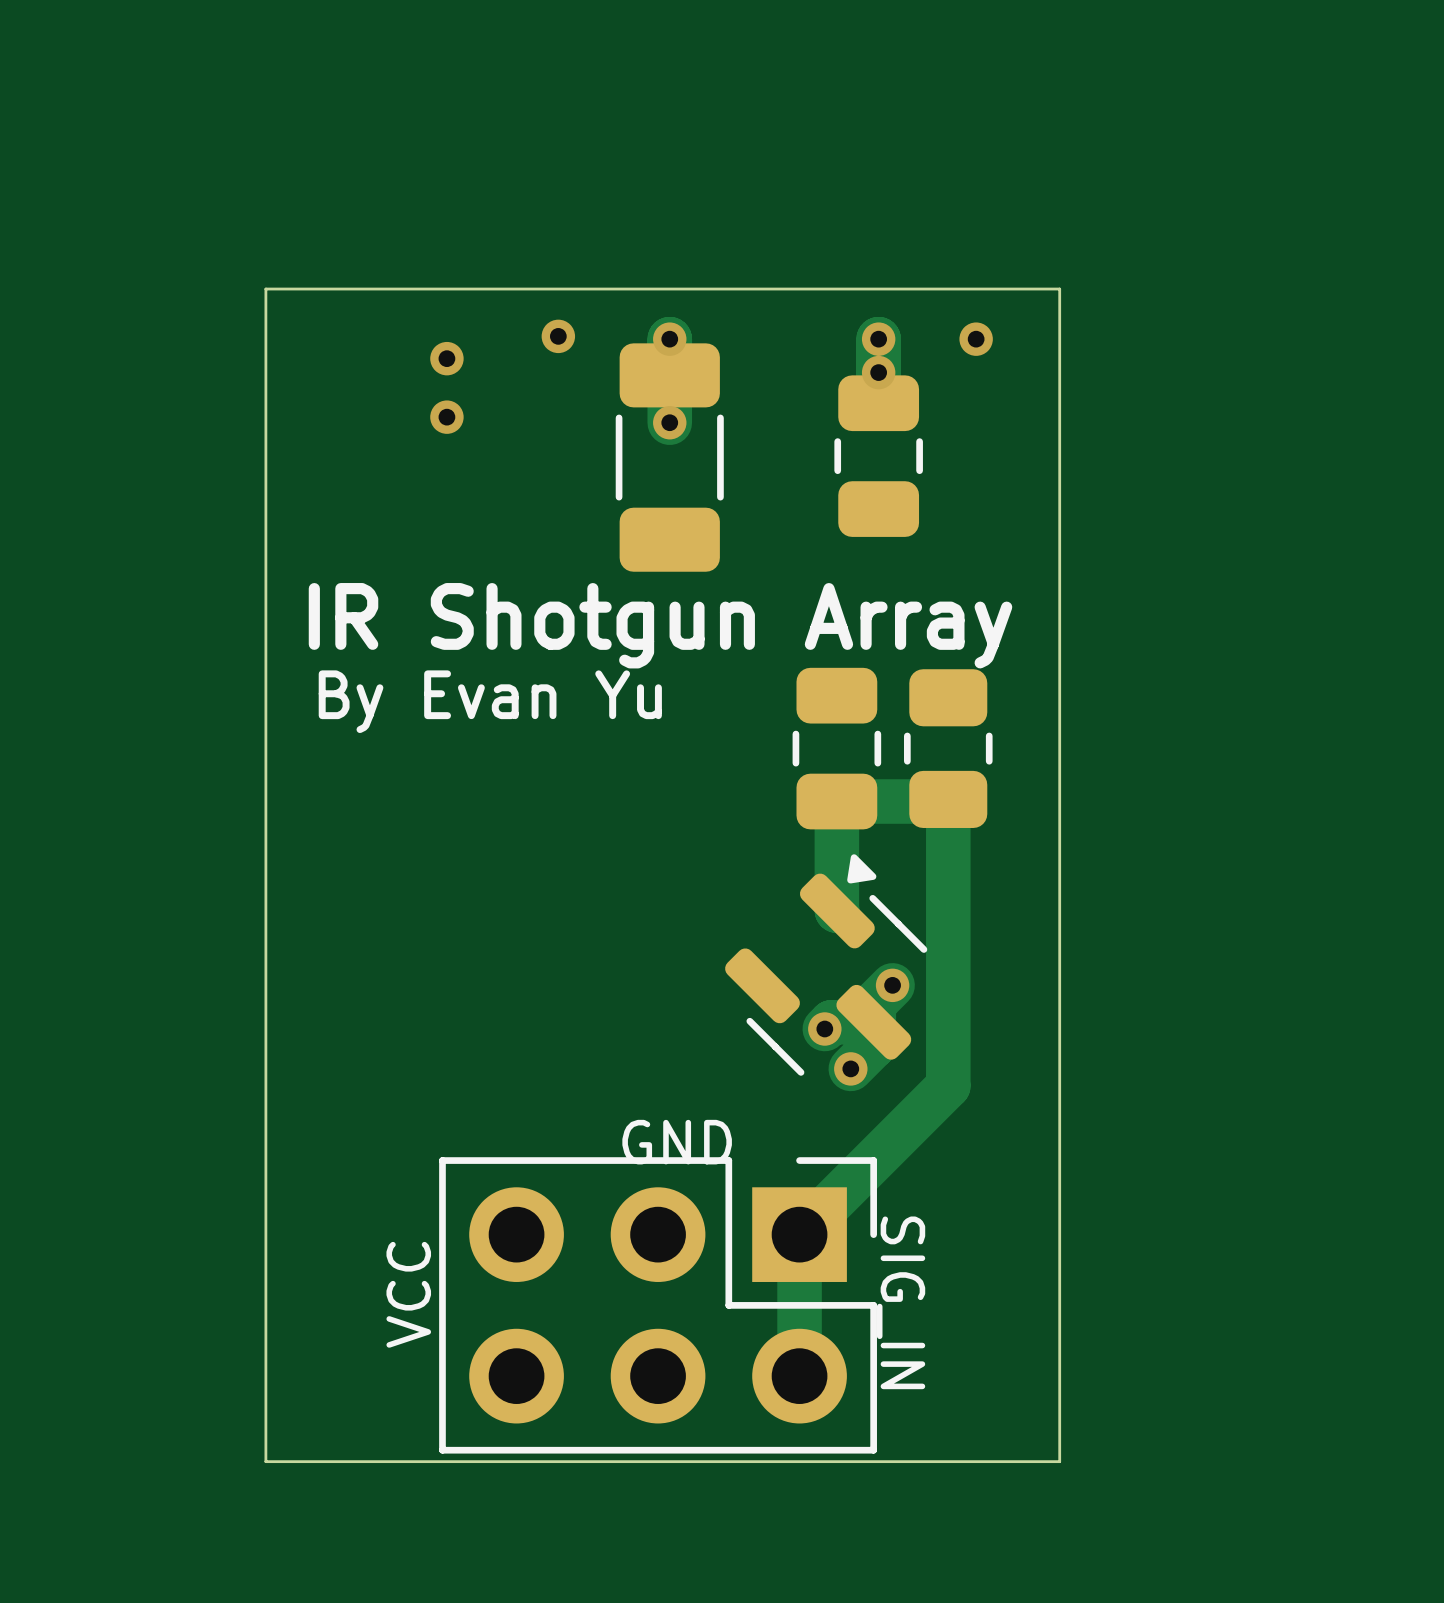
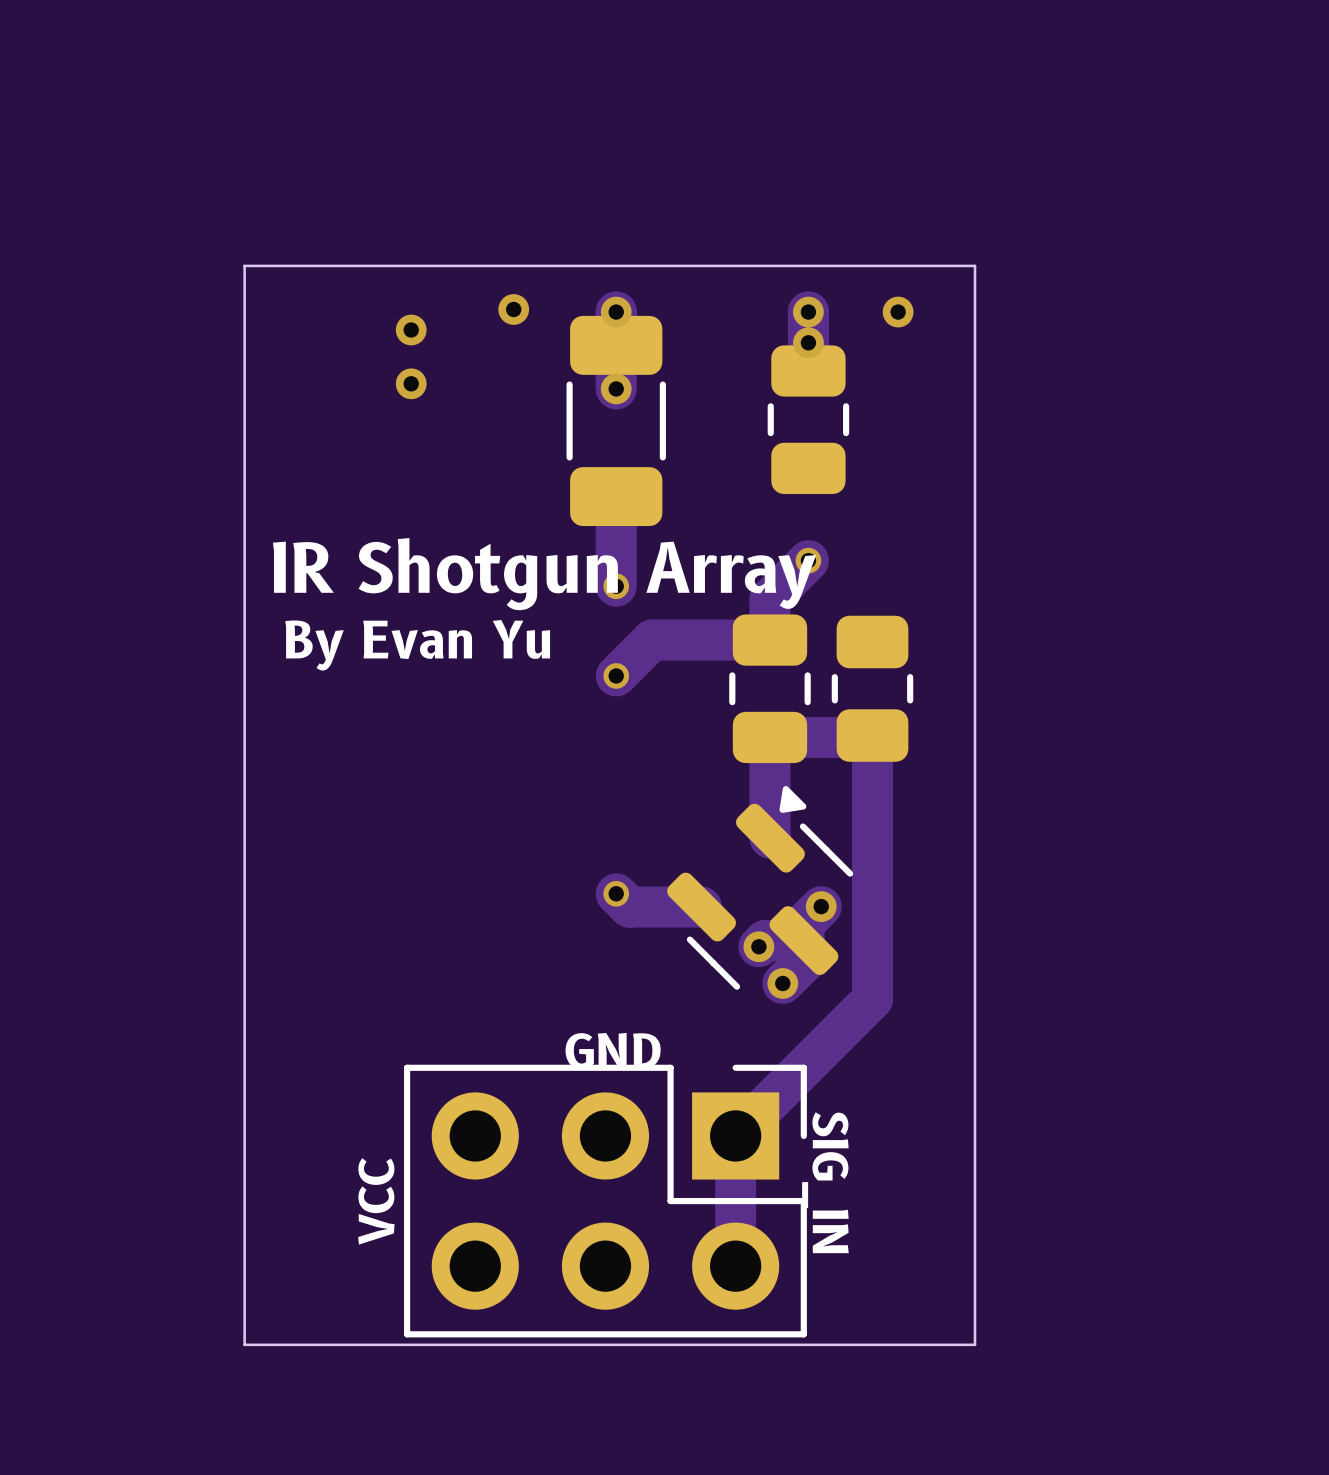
track: none -> (616, 496) (616, 586)
track: none -> (808, 560) (769, 599) (769, 640) (652, 640) (616, 675)
via: none -> (808, 560)
via: none -> (616, 586)
via: none -> (616, 675)
track: none -> (616, 893) (629, 907) (701, 907)
via: none -> (616, 893)

